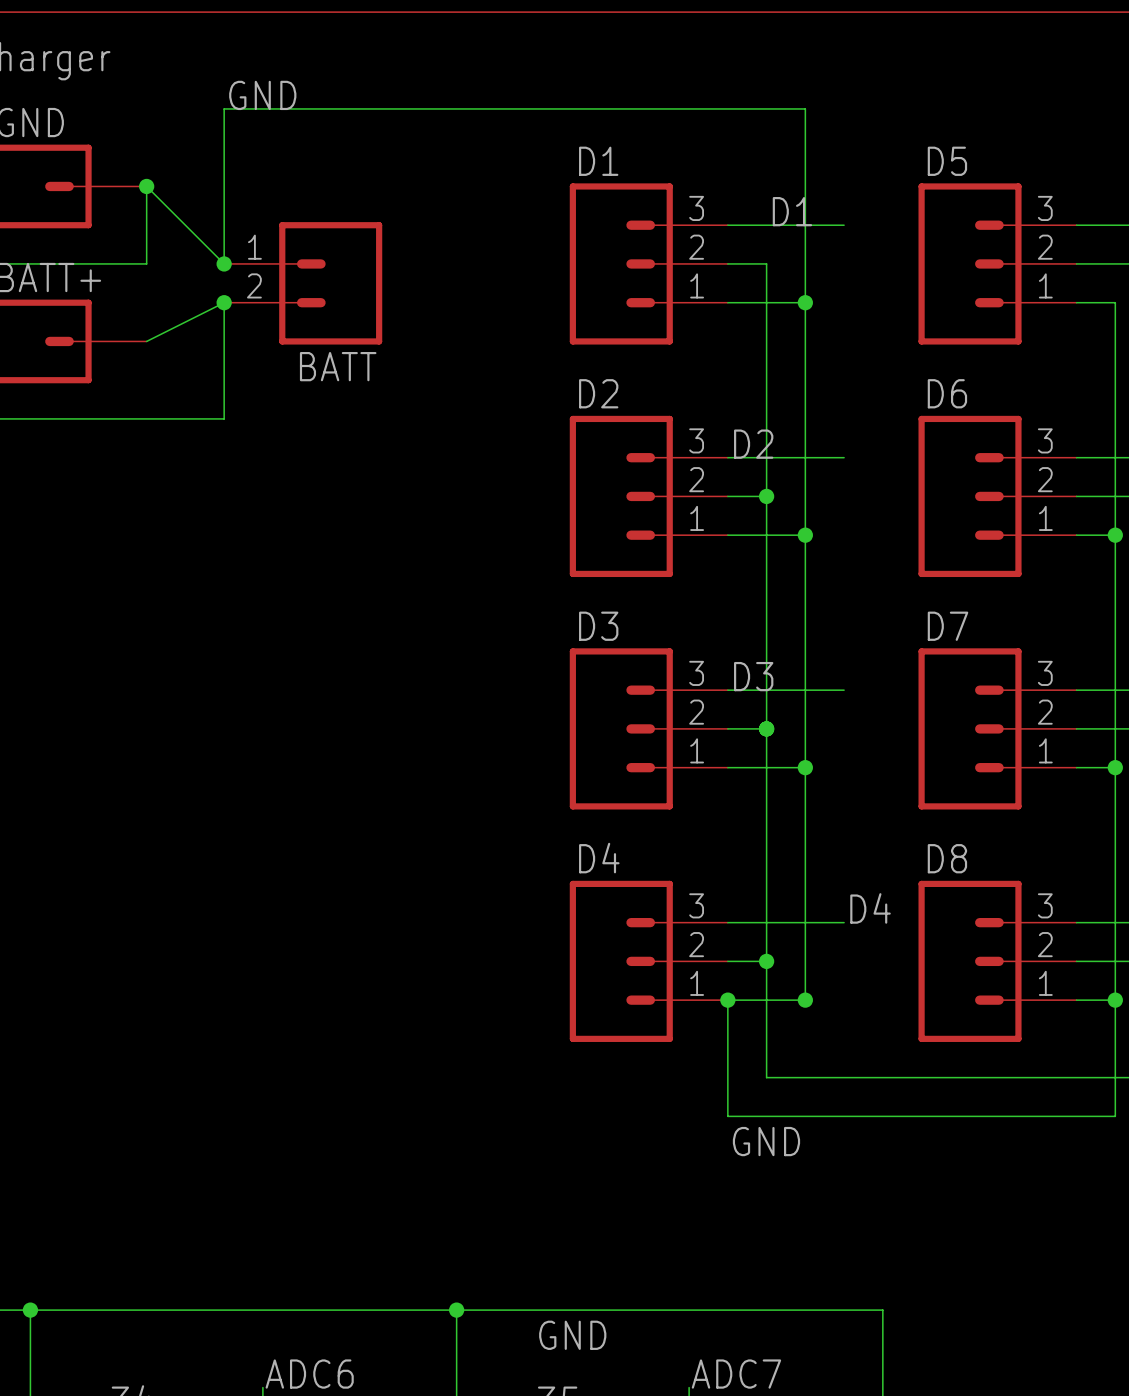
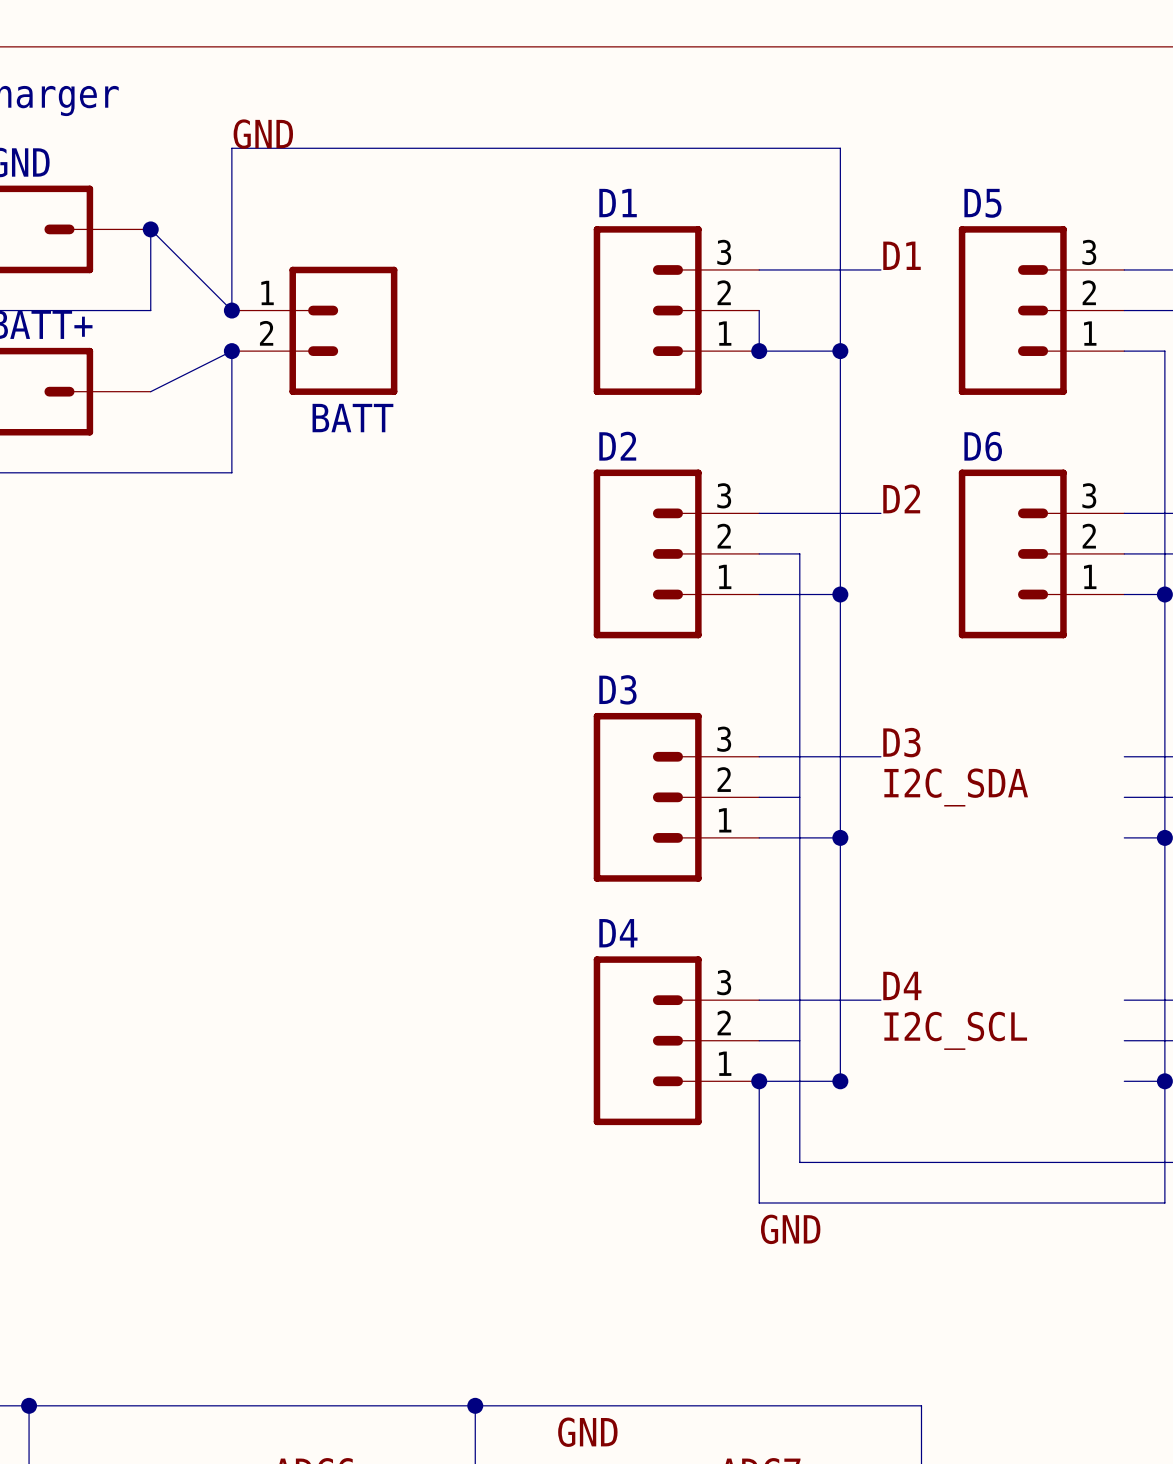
label position: D1 (792, 211) -> D1 (902, 255)
wire: (727, 263) (766, 263) (766, 496) -> (759, 310) (759, 351)
junction: none -> (759, 351)
label position: D2 (753, 444) -> D2 (901, 498)
junction: (766, 496) -> none
label position: D3 (753, 676) -> D3 (901, 742)
label: none -> I2C_SDA (956, 787)
junction: (766, 728) -> none
D7: (997, 728) -> none
label: none -> I2C_SCL (955, 1030)
junction: (766, 961) -> none
D8: (997, 961) -> none

